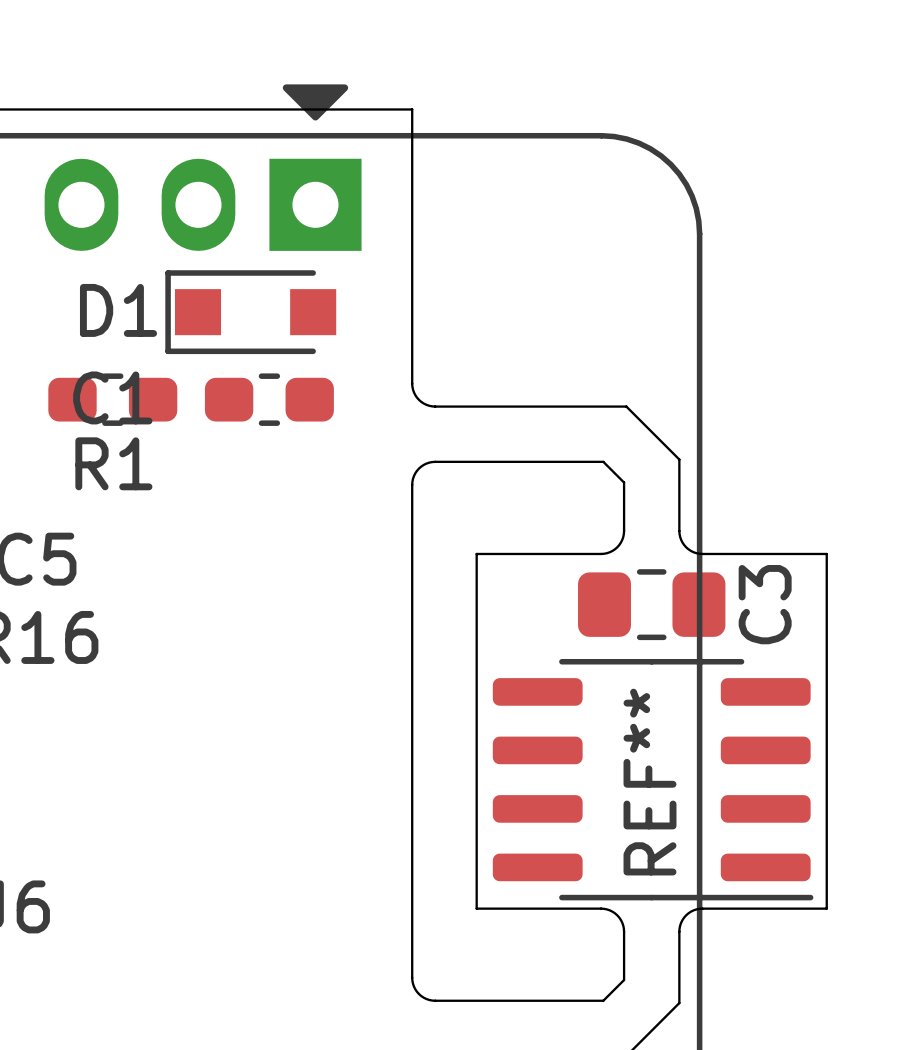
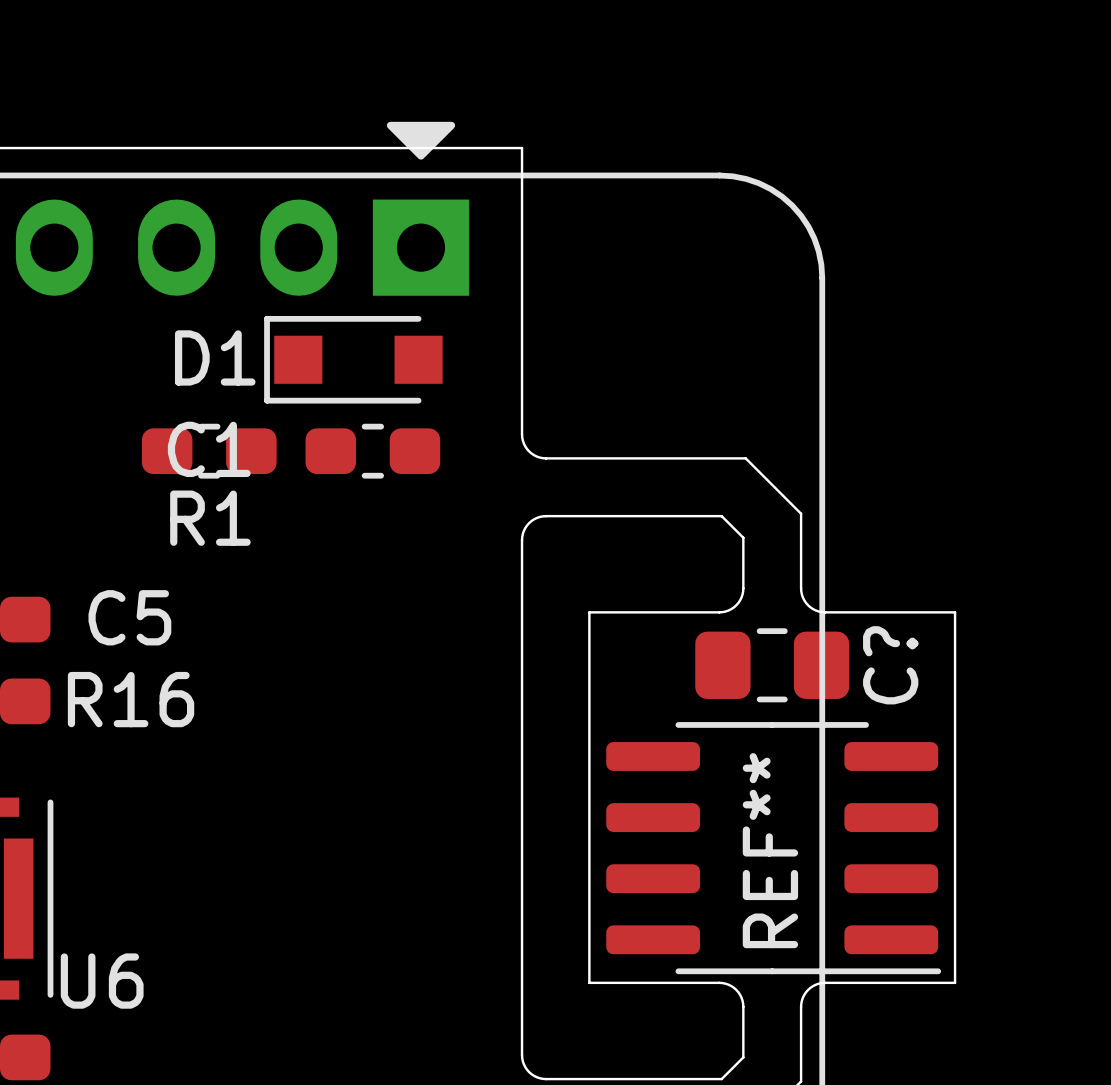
C3 name: C3 (765, 604) -> C? (890, 665)

